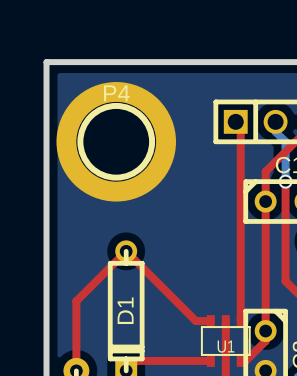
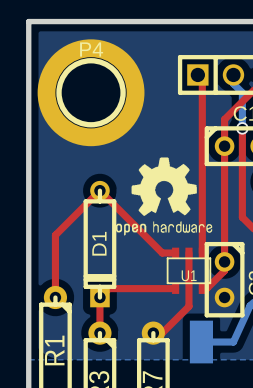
drawing: none -> [115, 157, 213, 236]

